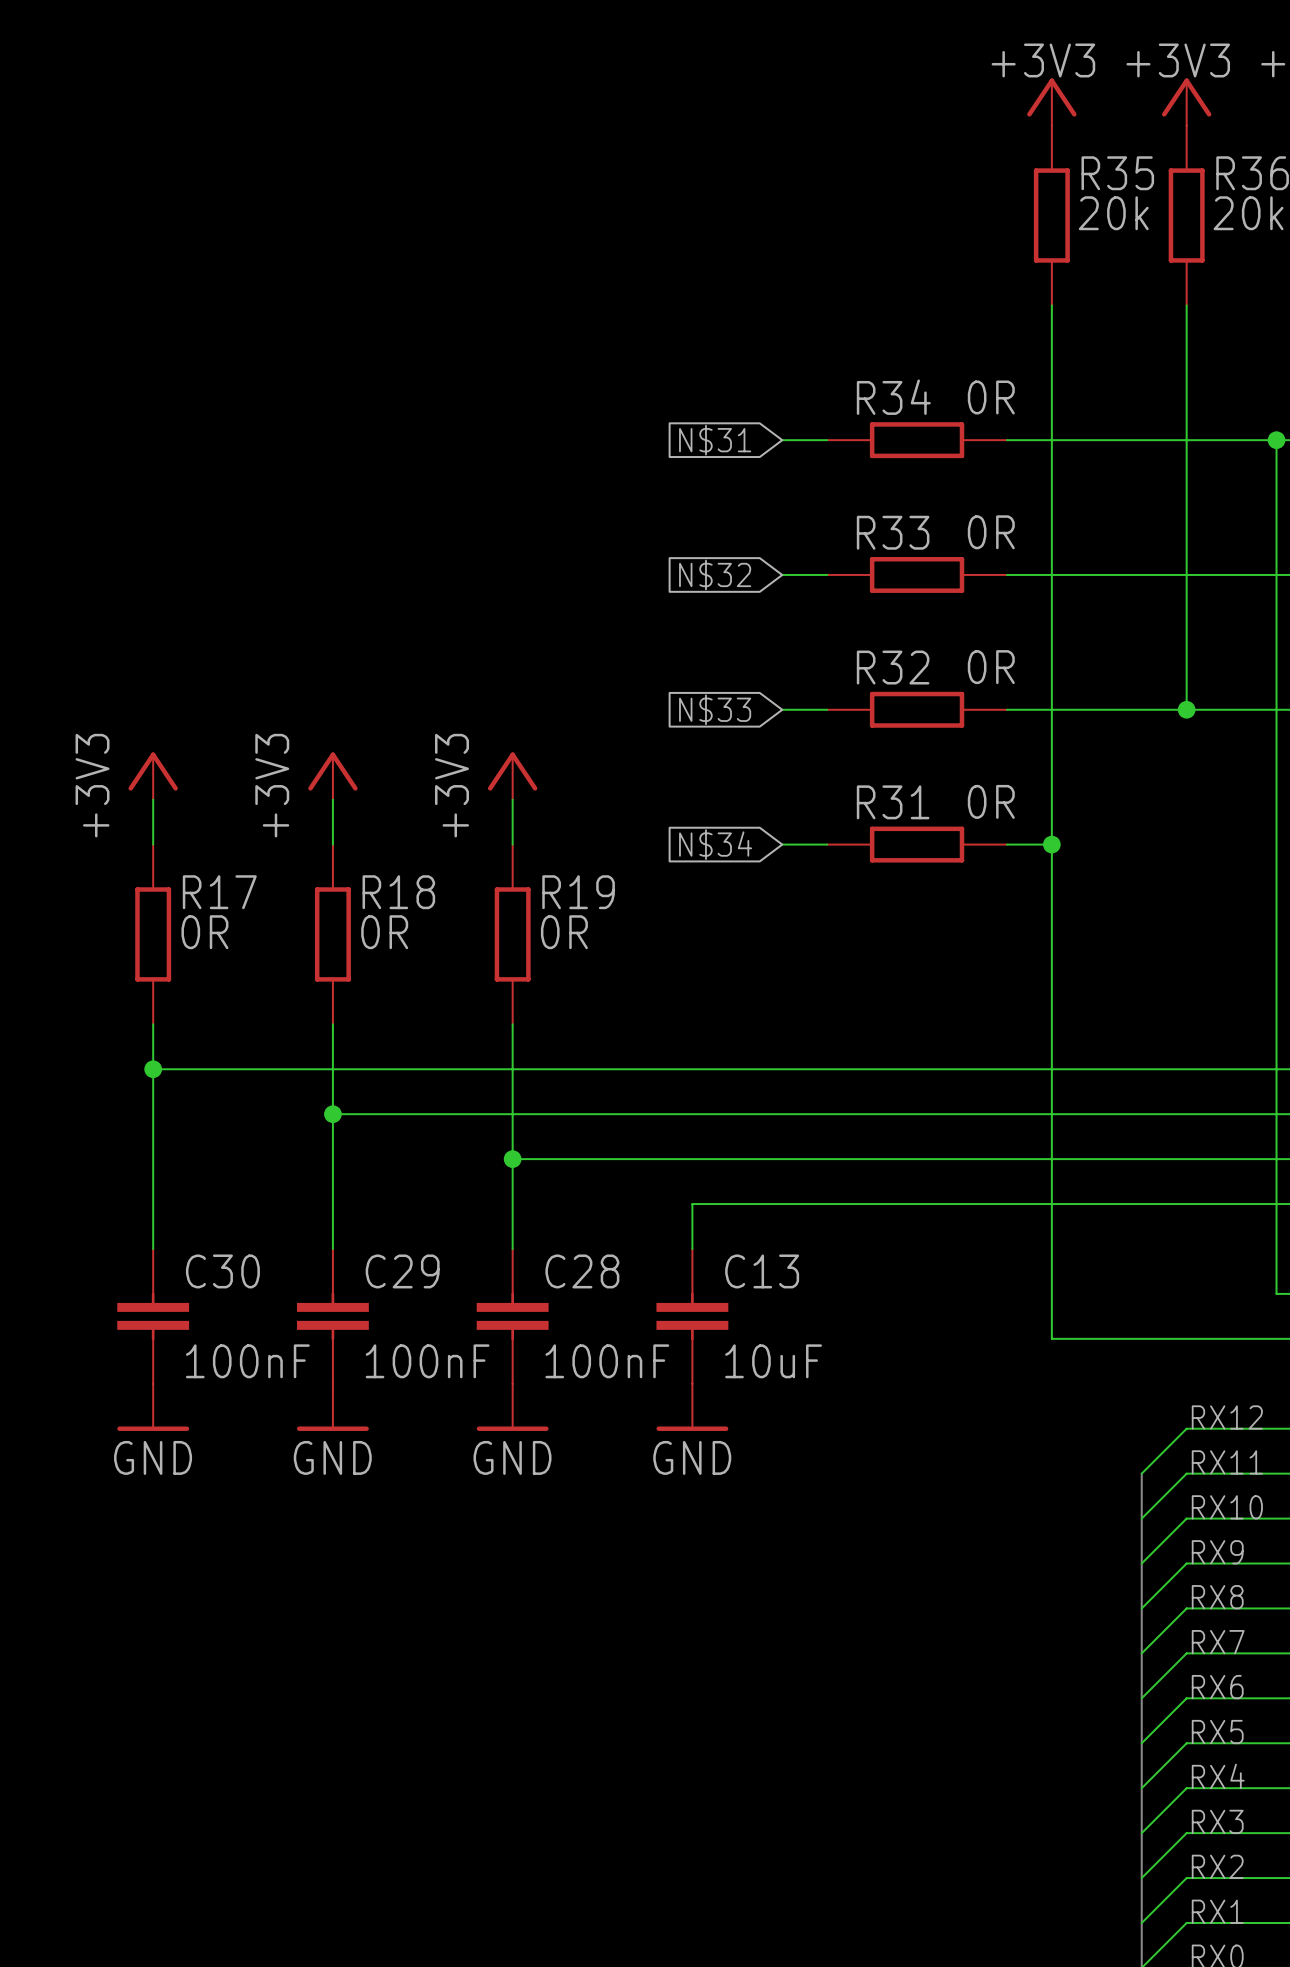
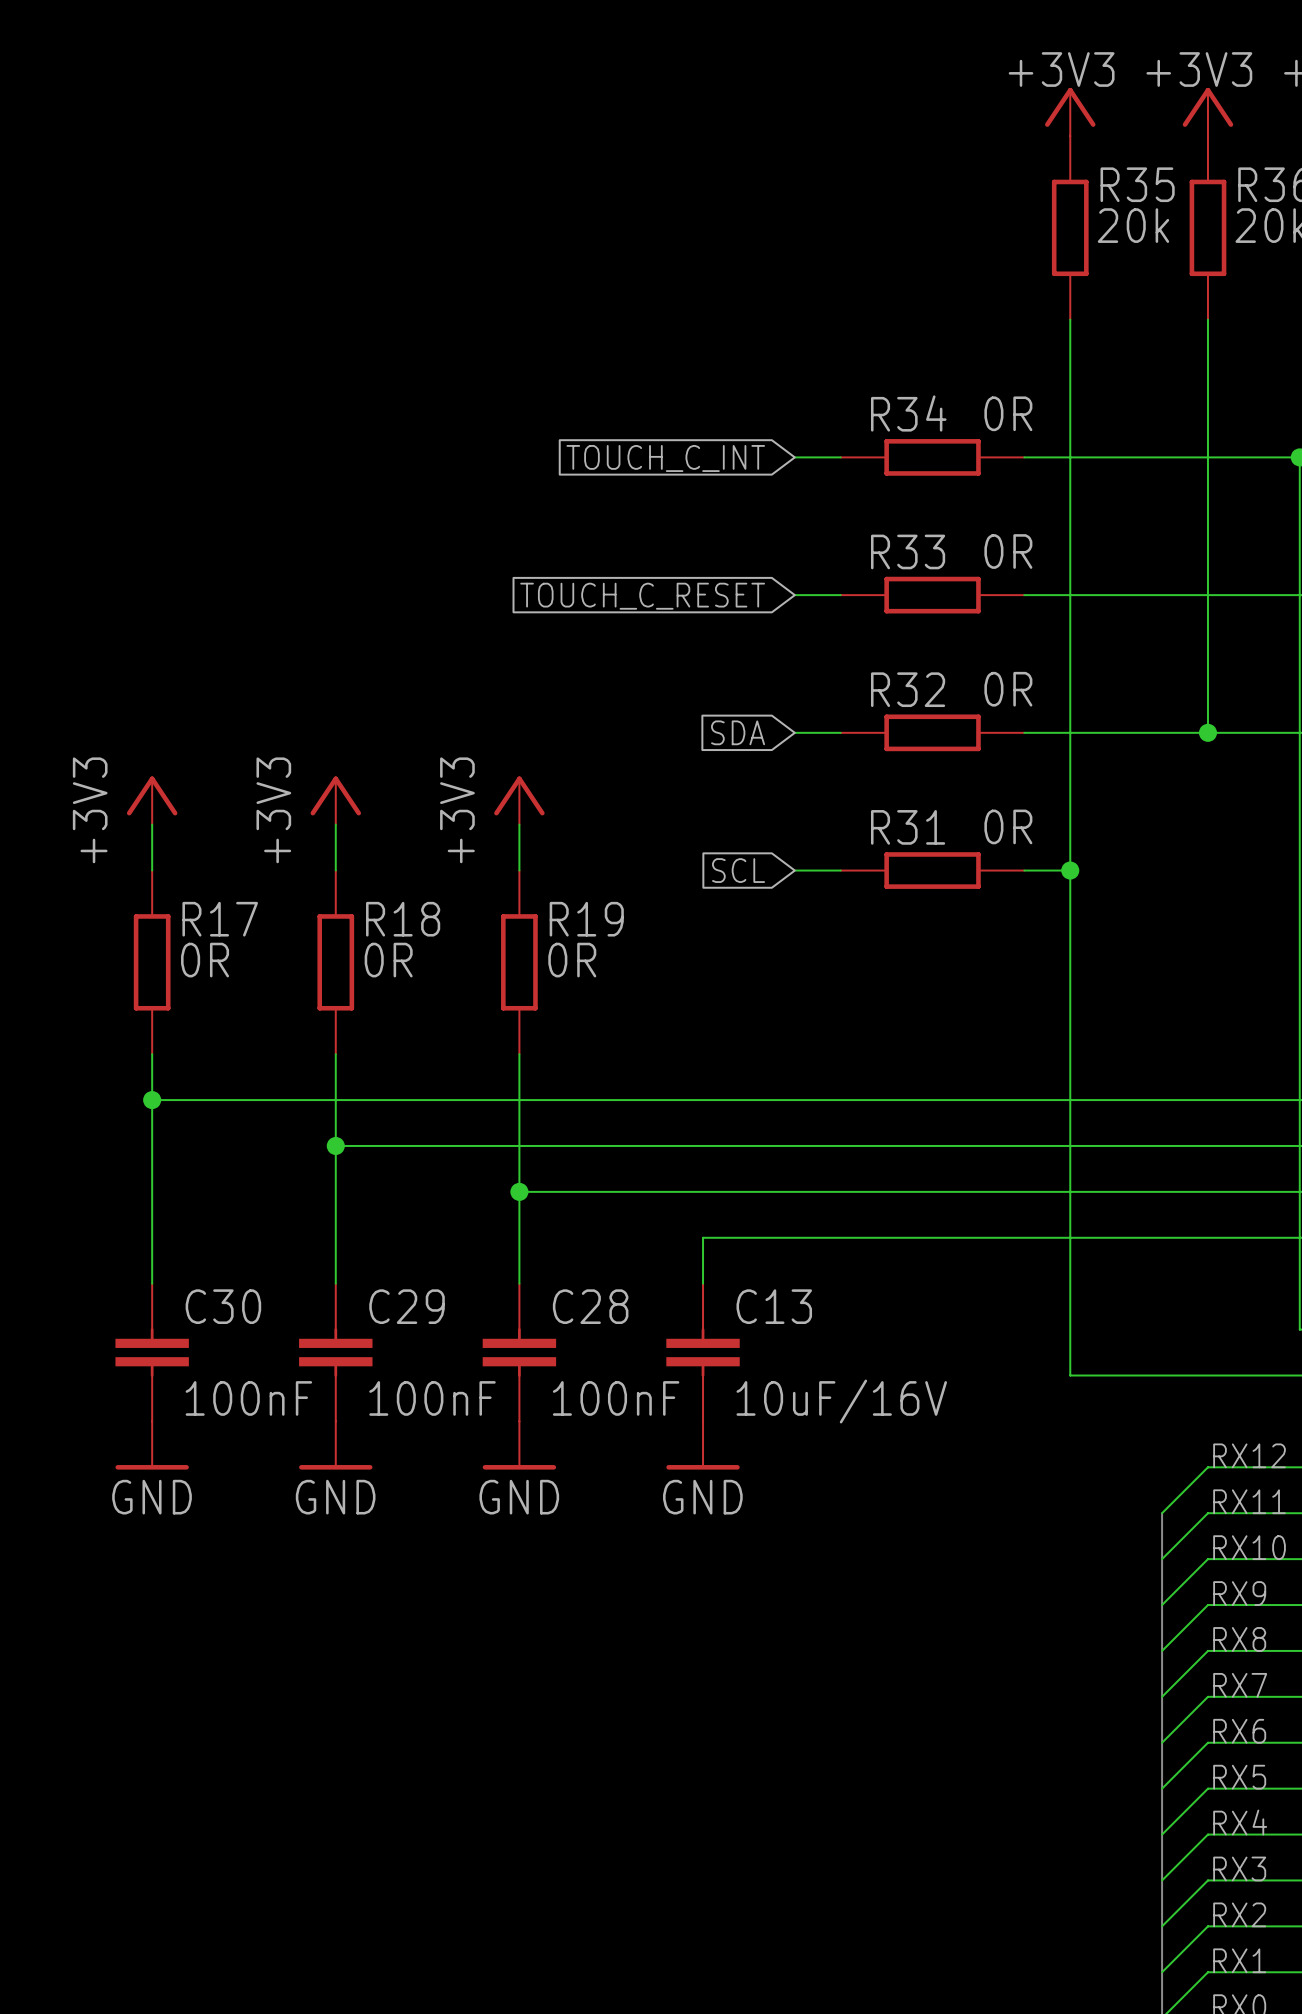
global label: N$31 (715, 440) -> TOUCH_C_INT (665, 458)
global label: N$32 (715, 574) -> TOUCH_C_RESET (642, 596)
global label: N$33 (715, 709) -> SDA (738, 732)
global label: N$34 (715, 844) -> SCL (738, 870)
C13 value: 10uF (773, 1361) -> 10uF/16V (841, 1401)

